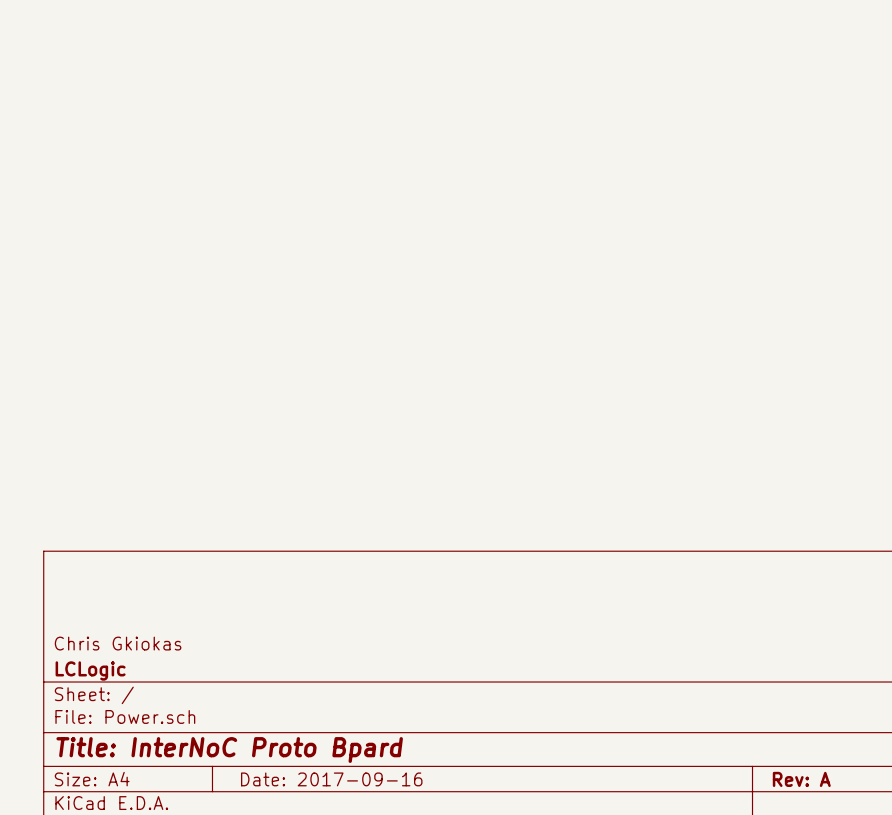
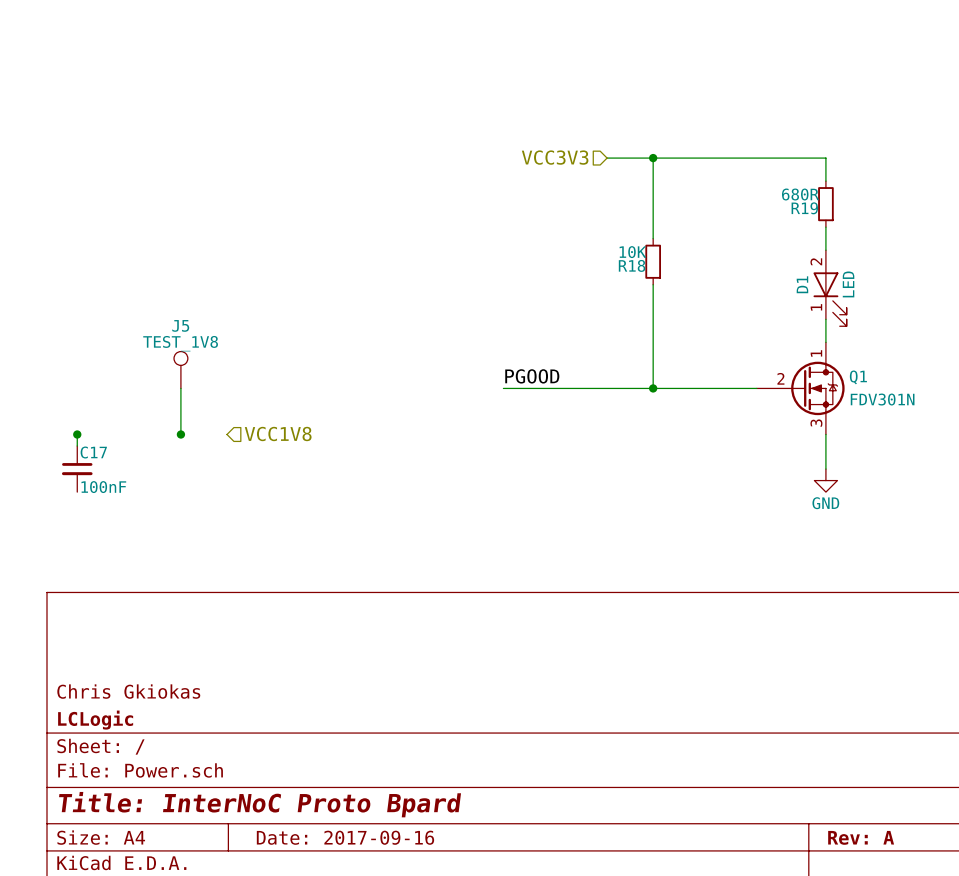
hierarchical label: none -> VCC3V3 (555, 157)
wire: none -> (607, 158) (825, 158) (825, 181)
wire: none -> (653, 158) (653, 238)
junction: none -> (653, 158)
R19: none -> 680R (825, 204)
wire: none -> (825, 227) (825, 250)
R18: none -> 10K (653, 261)
wire: none -> (653, 284) (653, 388)
D1: none -> LED (830, 288)
wire: none -> (825, 319) (825, 342)
J5: none -> TEST_1V8 (180, 370)
label: none -> PGOOD (532, 376)
wire: none -> (180, 388) (180, 434)
wire: none -> (503, 388) (756, 388)
junction: none -> (653, 388)
Q1: none -> FDV301N (800, 388)
hierarchical label: none -> VCC1V8 (278, 434)
wire: none -> (77, 434) (77, 446)
junction: none -> (77, 434)
junction: none -> (180, 434)
wire: none -> (825, 434) (825, 469)
C17: none -> 100nF (77, 469)
power symbol: none -> GND (825, 480)

